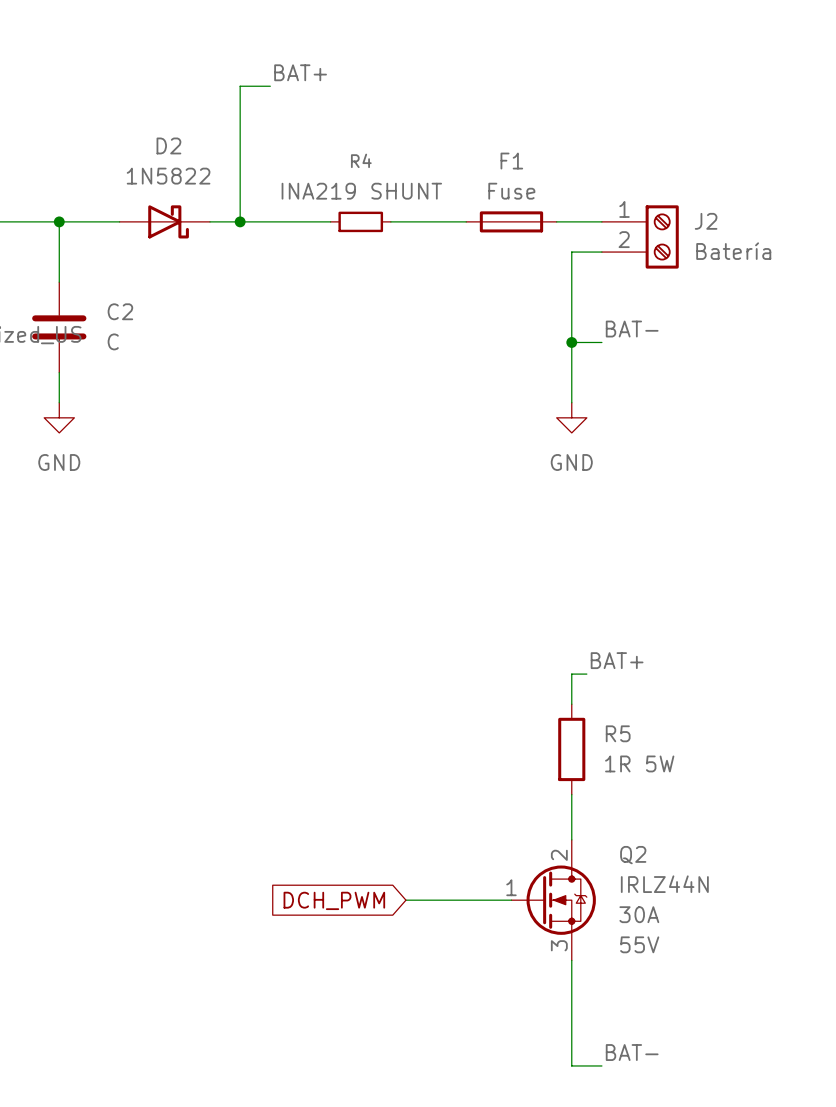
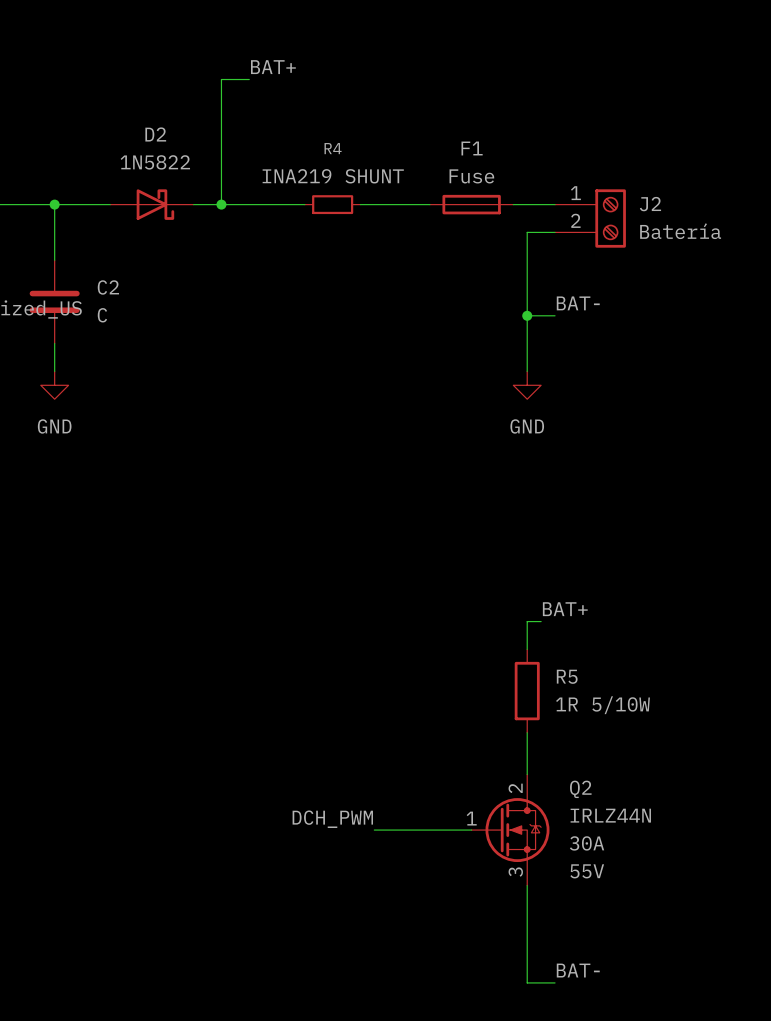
R5 value: 1R 5W (639, 763) -> 1R 5/10W (602, 705)
label: none -> DCH_PWM (332, 819)
global label: DCH_PWM (334, 900) -> none

